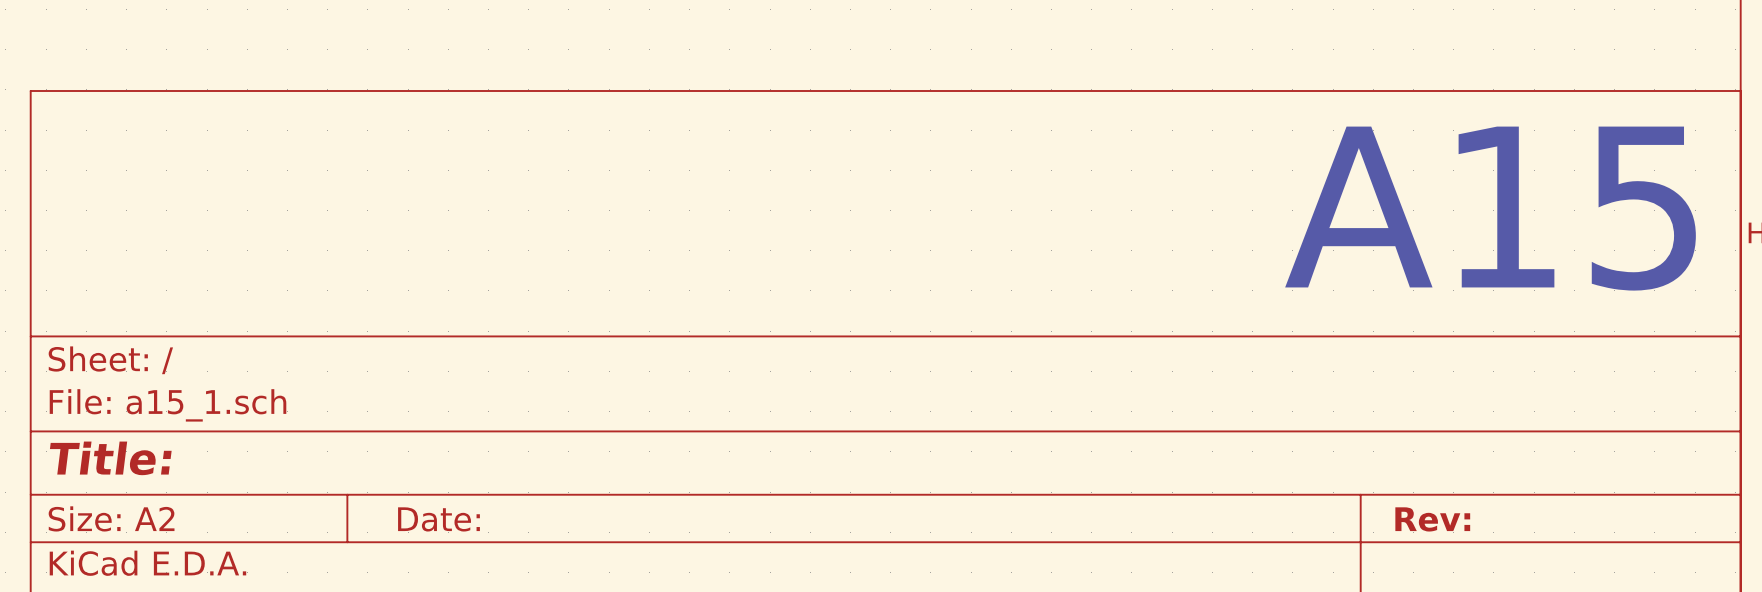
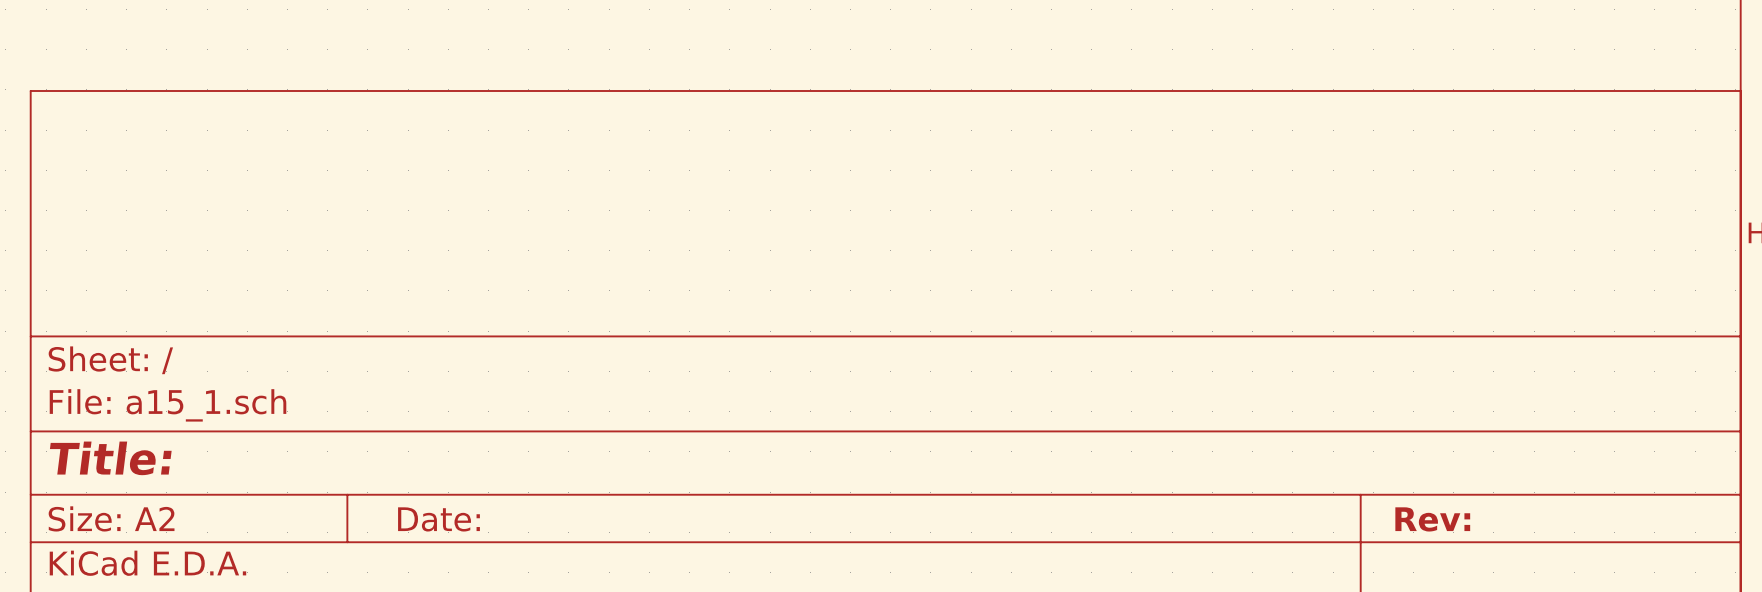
text: A15 (1490, 208) -> none

